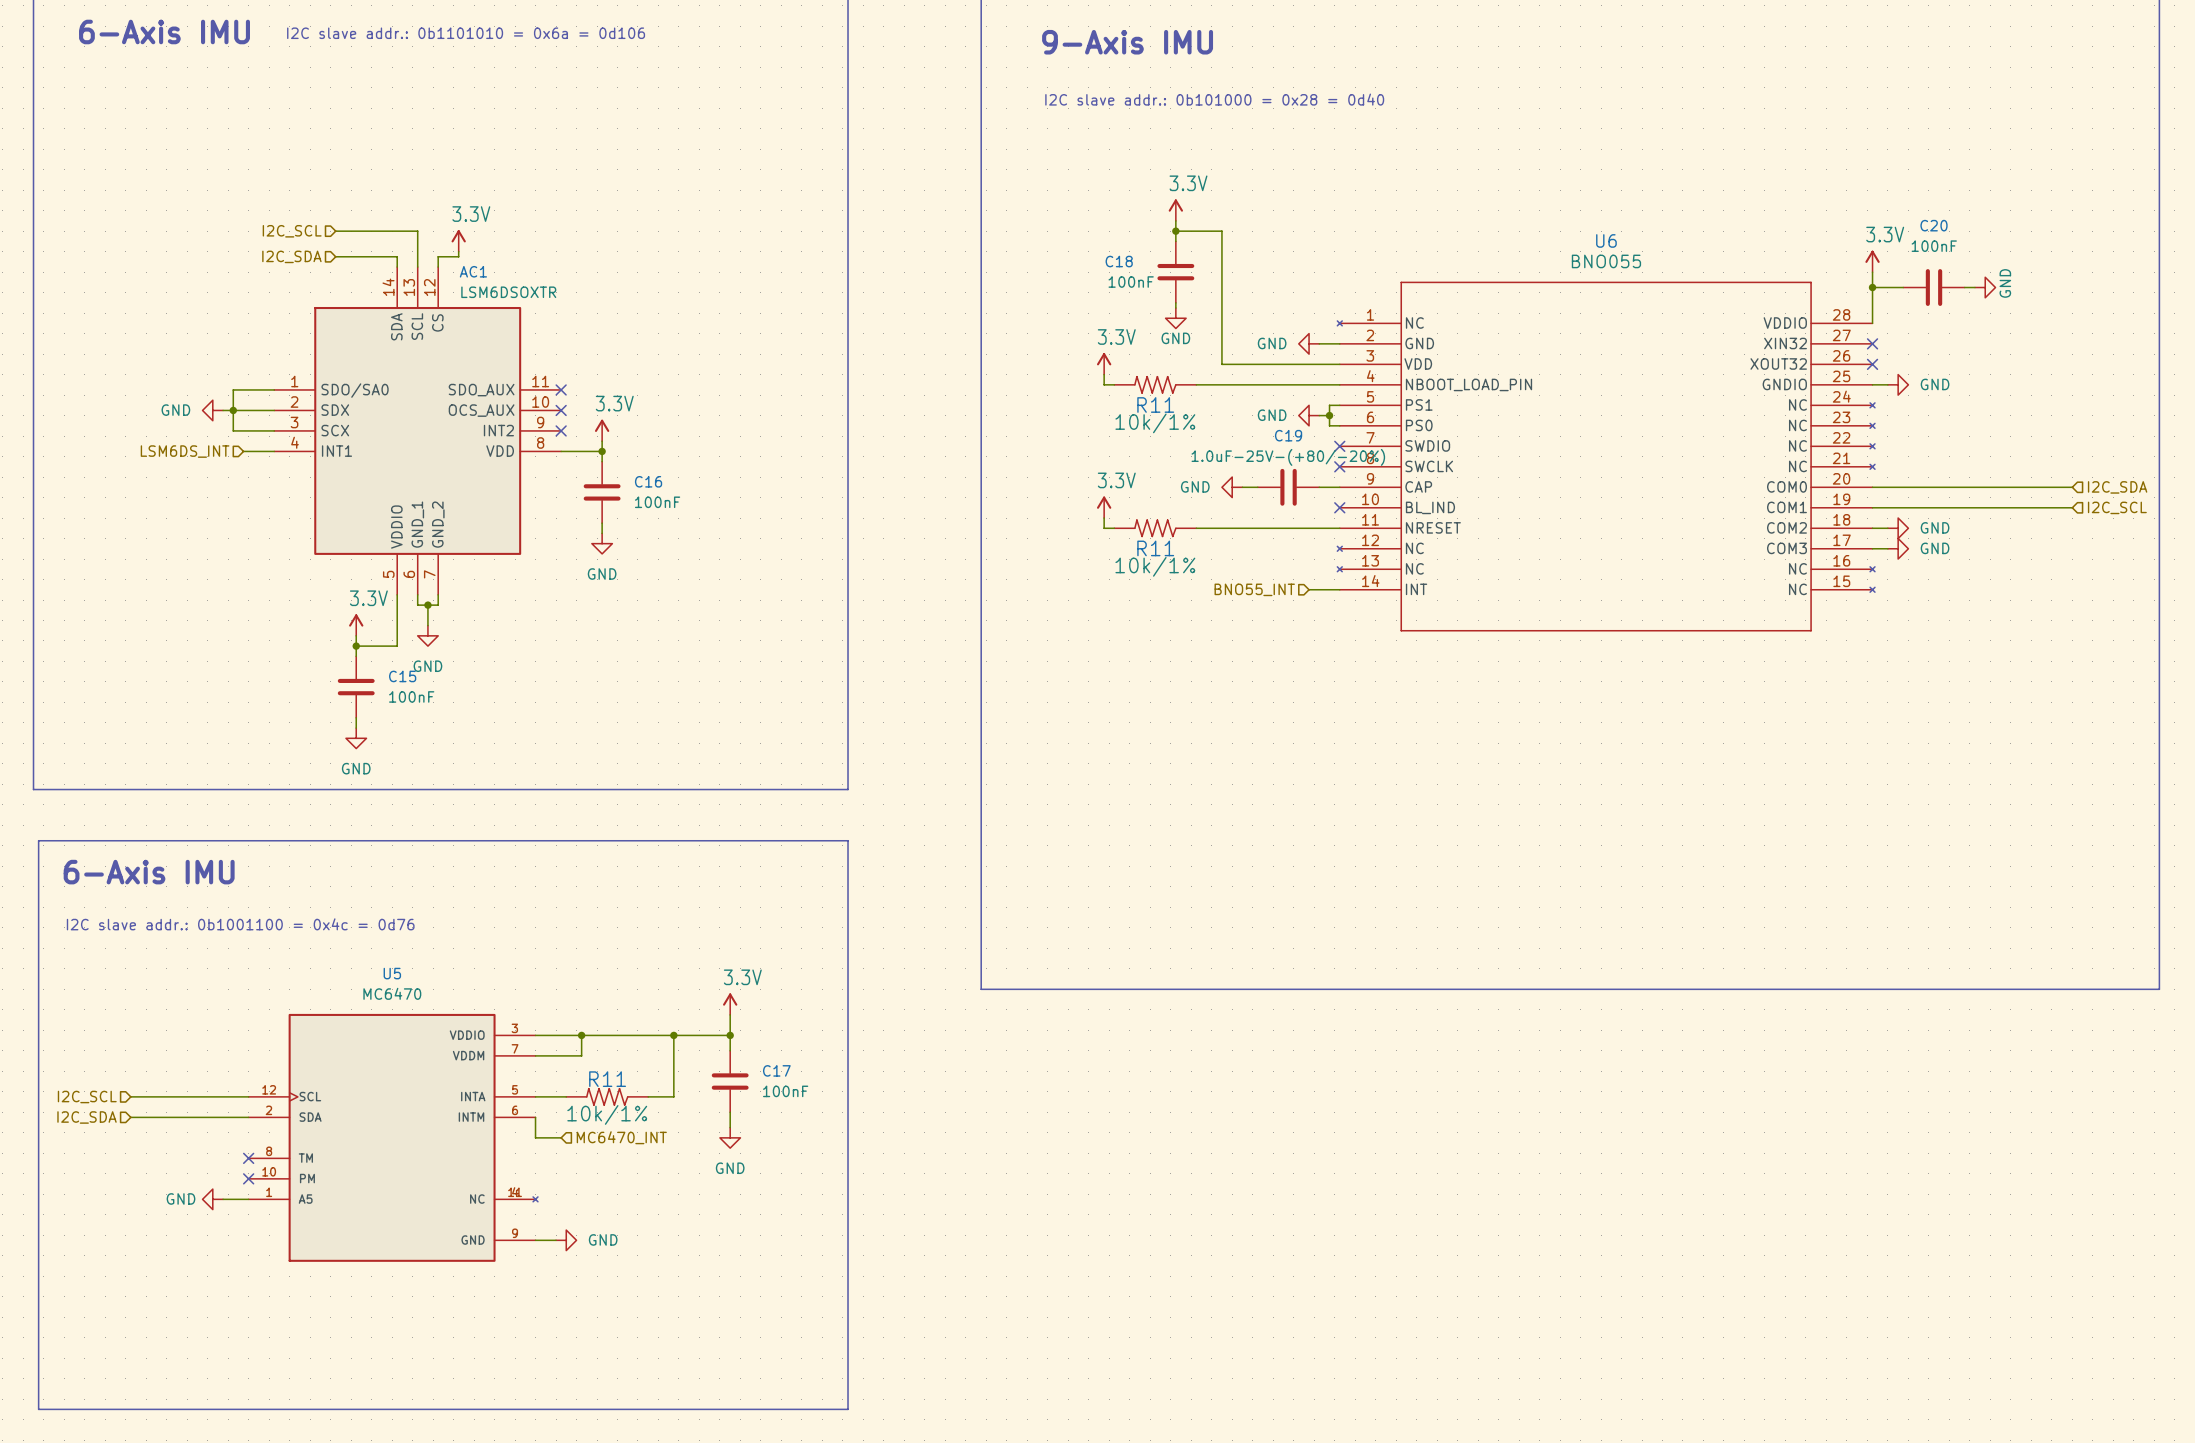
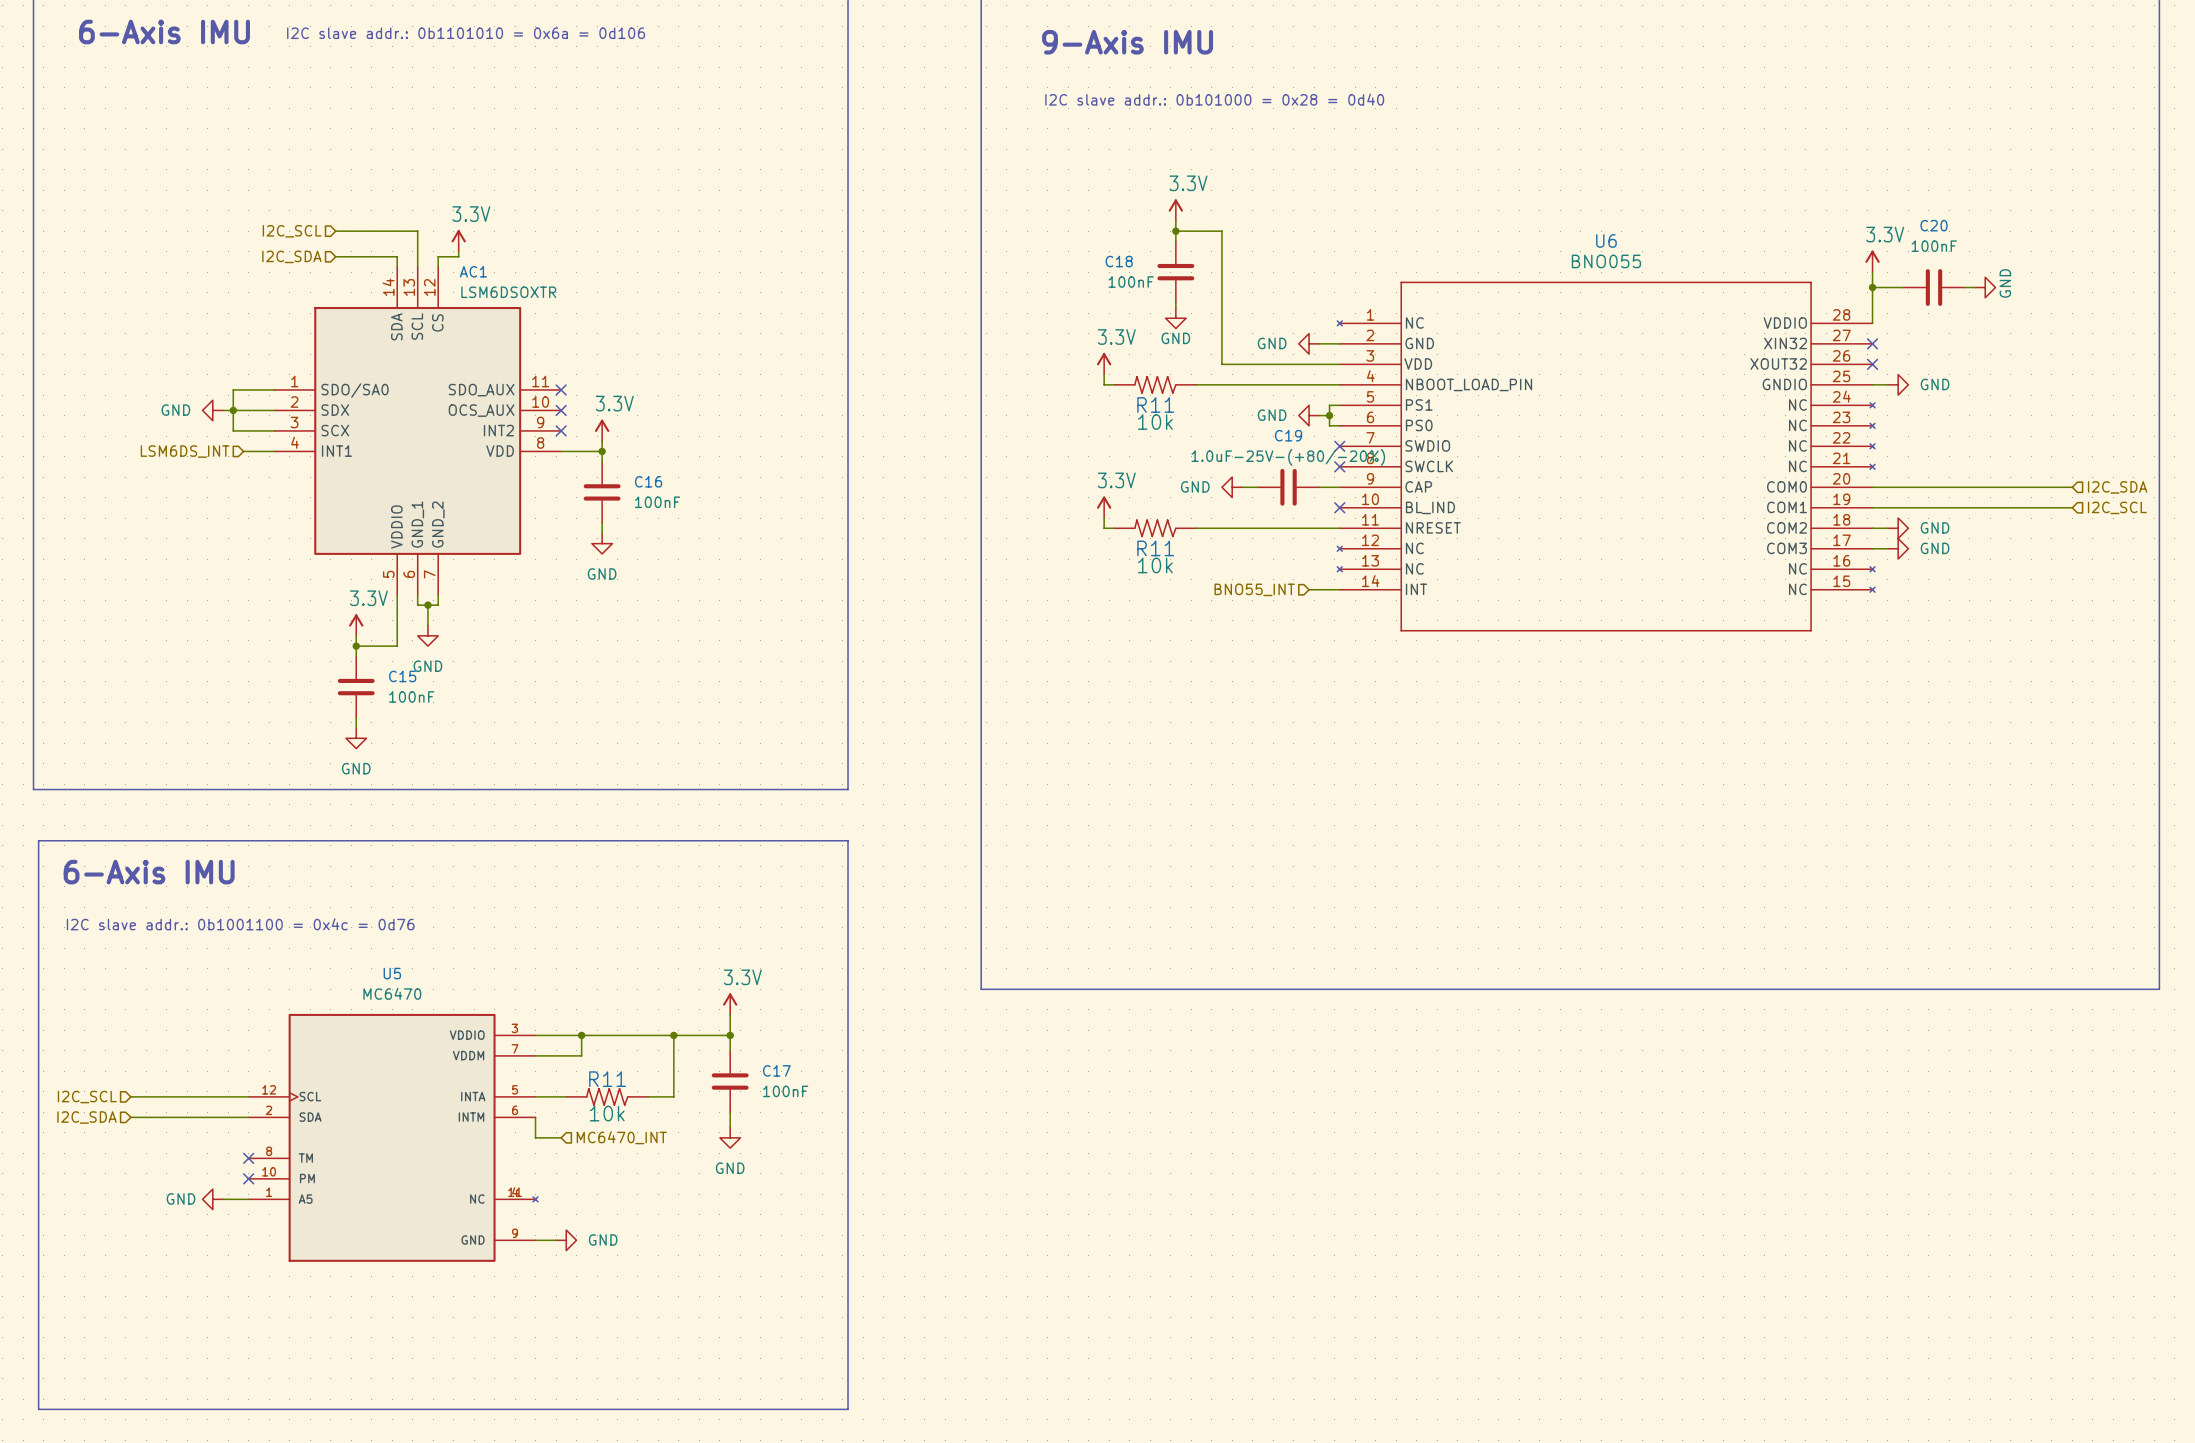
R11 value: 10k/1% (1155, 423) -> 10k (1155, 422)
R11 value: 10k/1% (1155, 566) -> 10k (1155, 565)
R11 value: 10k/1% (607, 1114) -> 10k (607, 1113)

